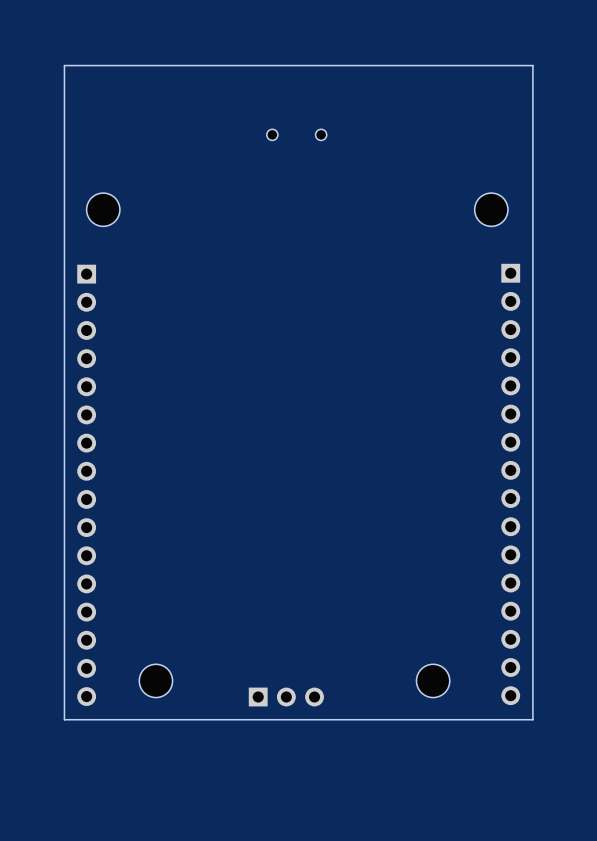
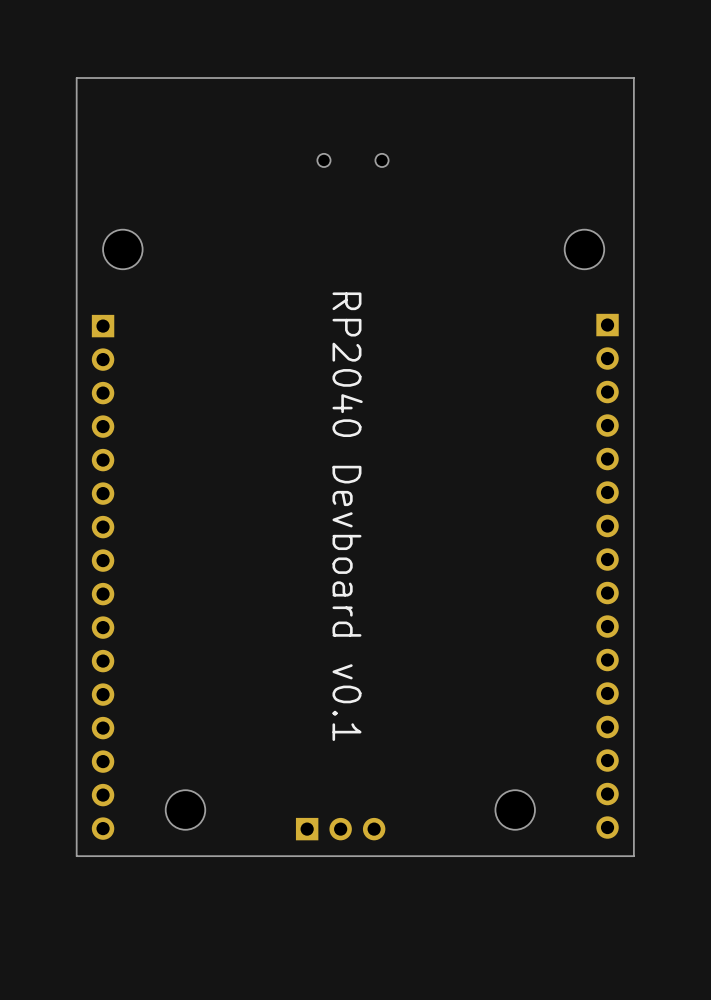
text: none -> RP2040 Devboard v0.1 (347, 516)

